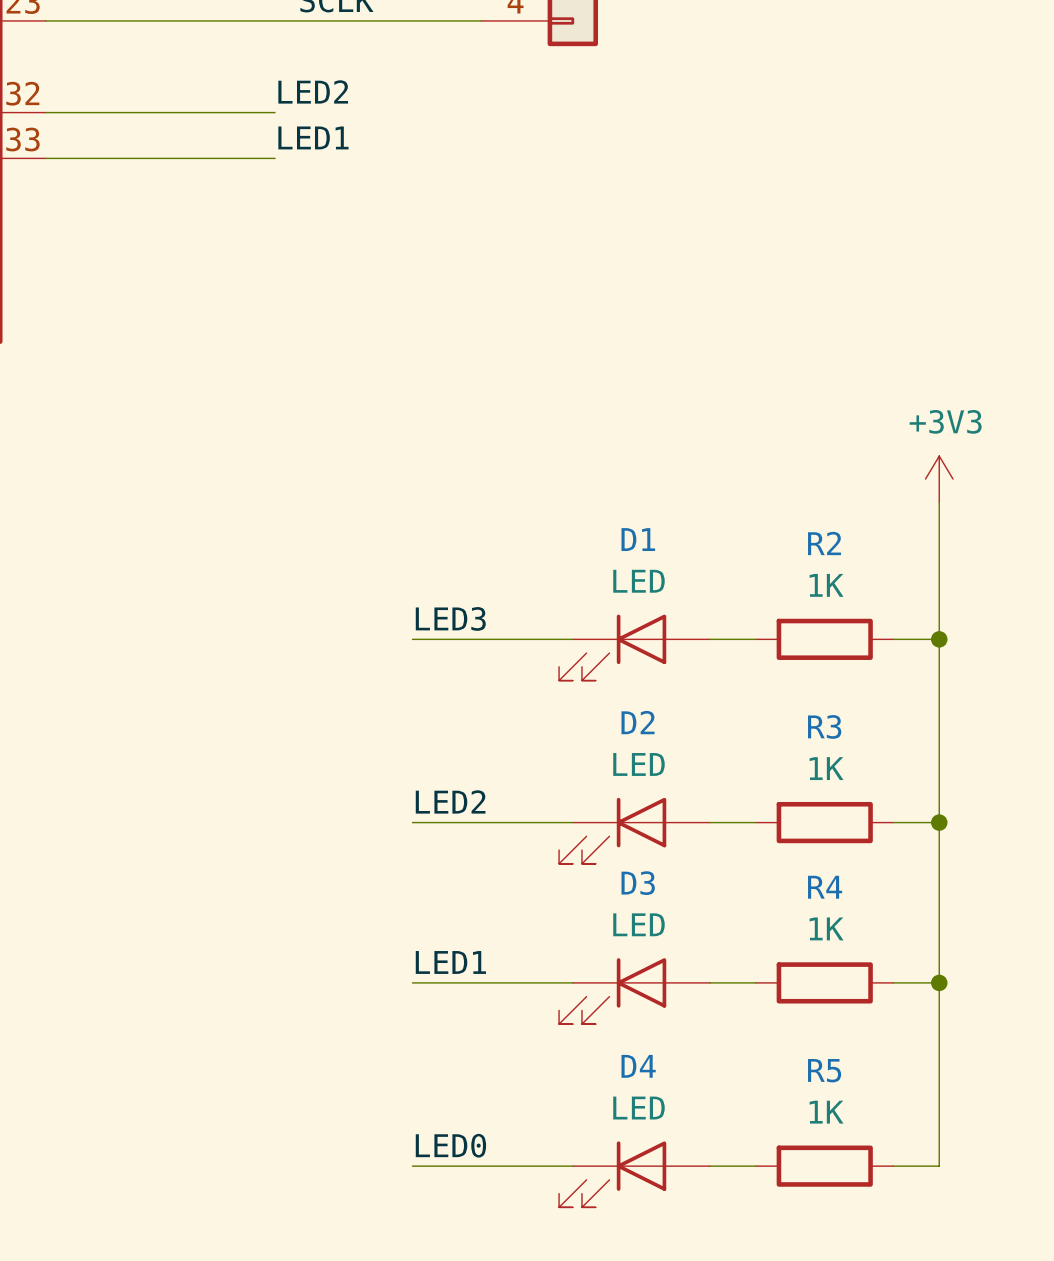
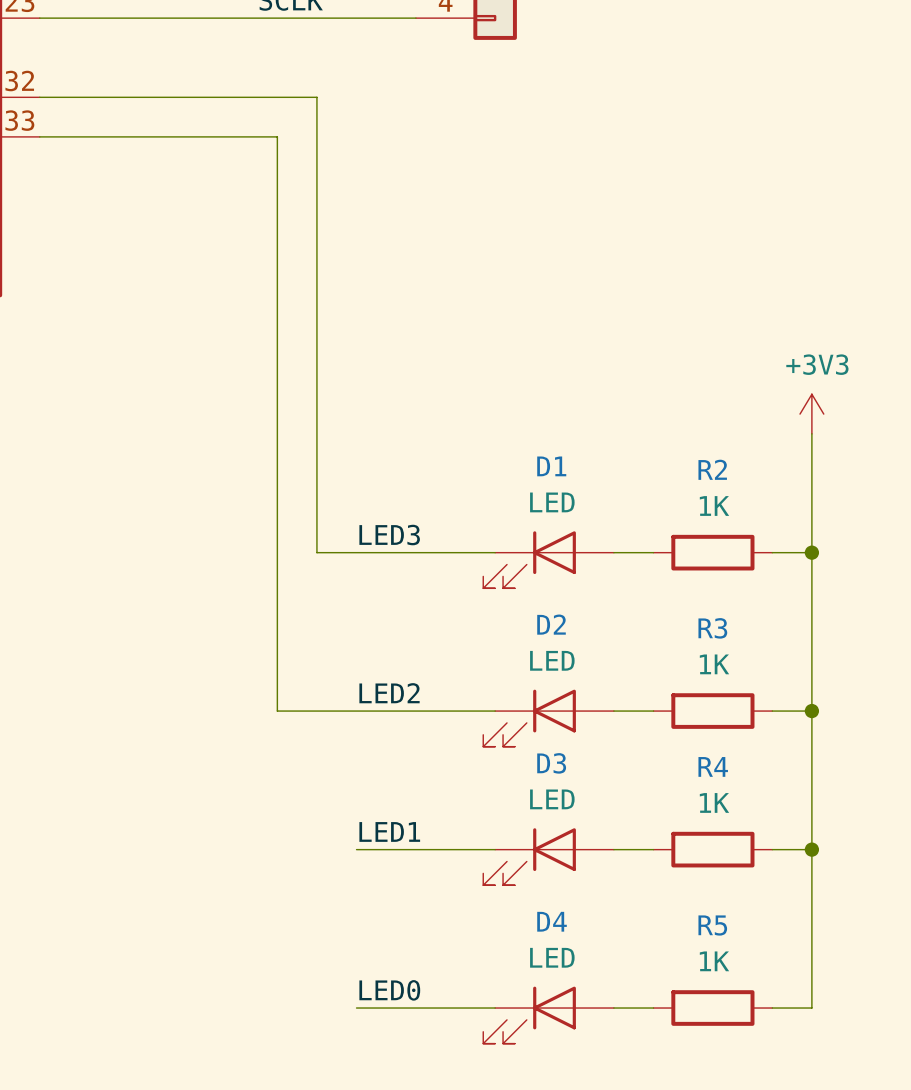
label: LED2 (313, 91) -> none
wire: none -> (237, 97) (316, 97) (316, 552) (356, 552)
label: LED1 (313, 137) -> none
wire: none -> (237, 136) (277, 136) (277, 711) (356, 711)

